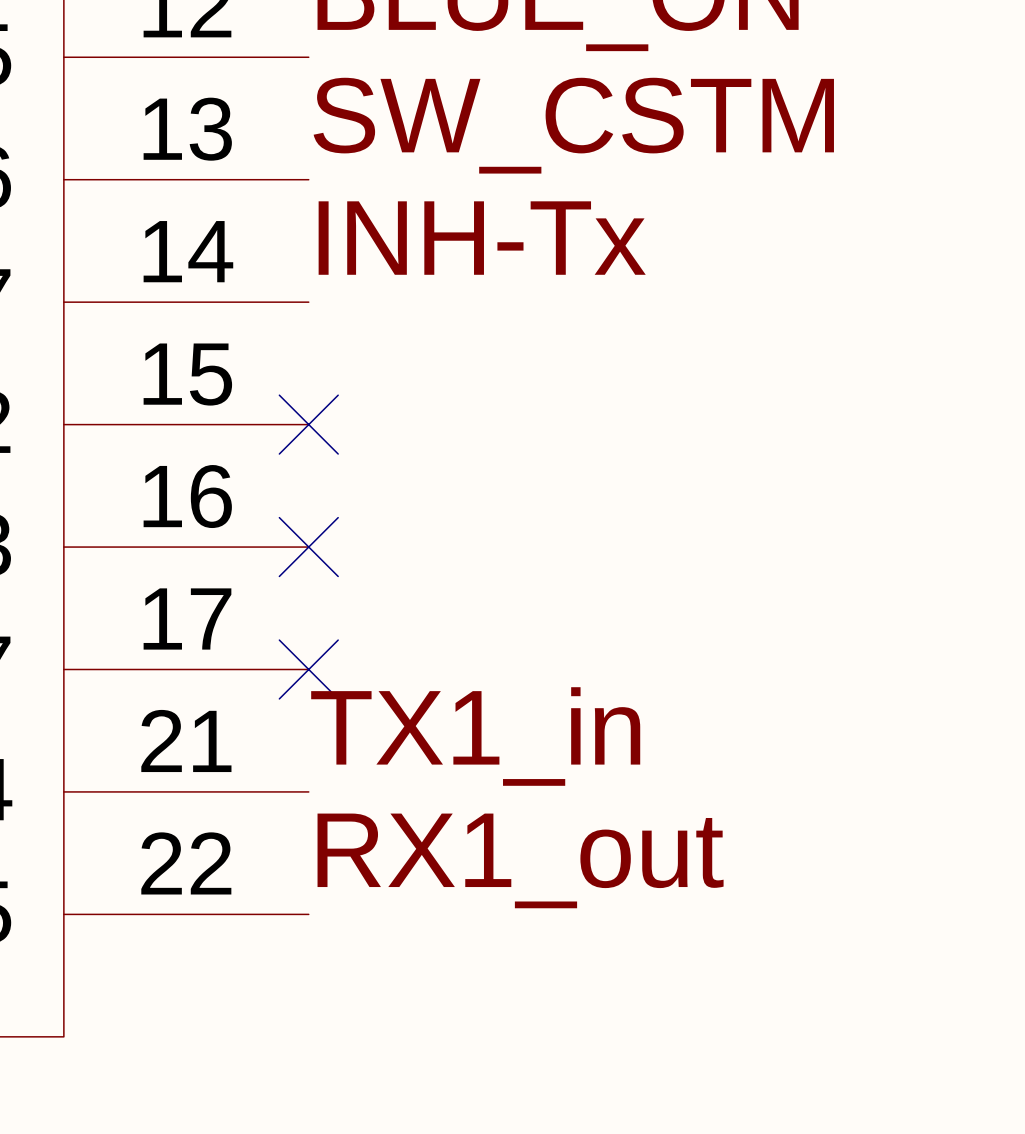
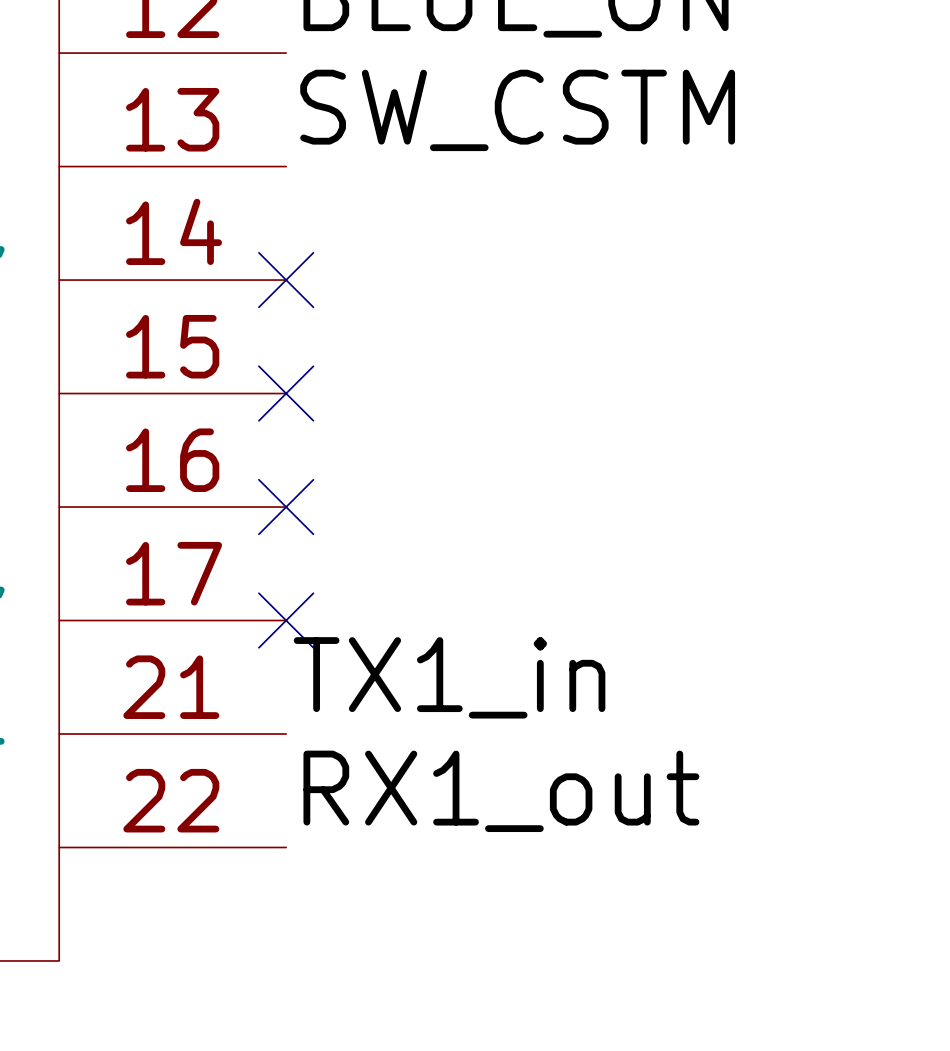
label: INH-Tx (482, 238) -> none
no-connect mark: none -> (286, 280)

